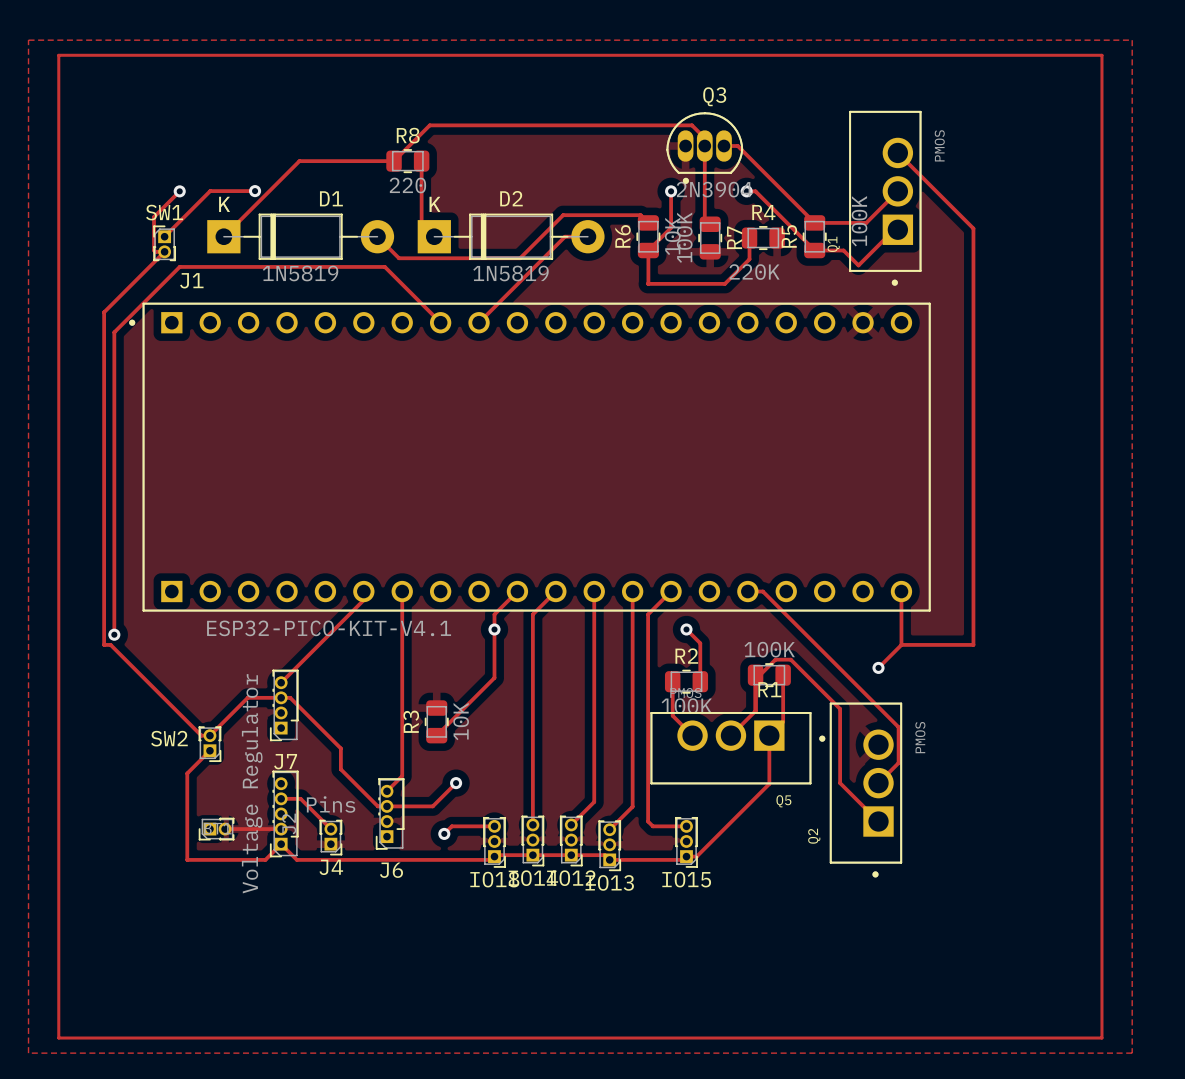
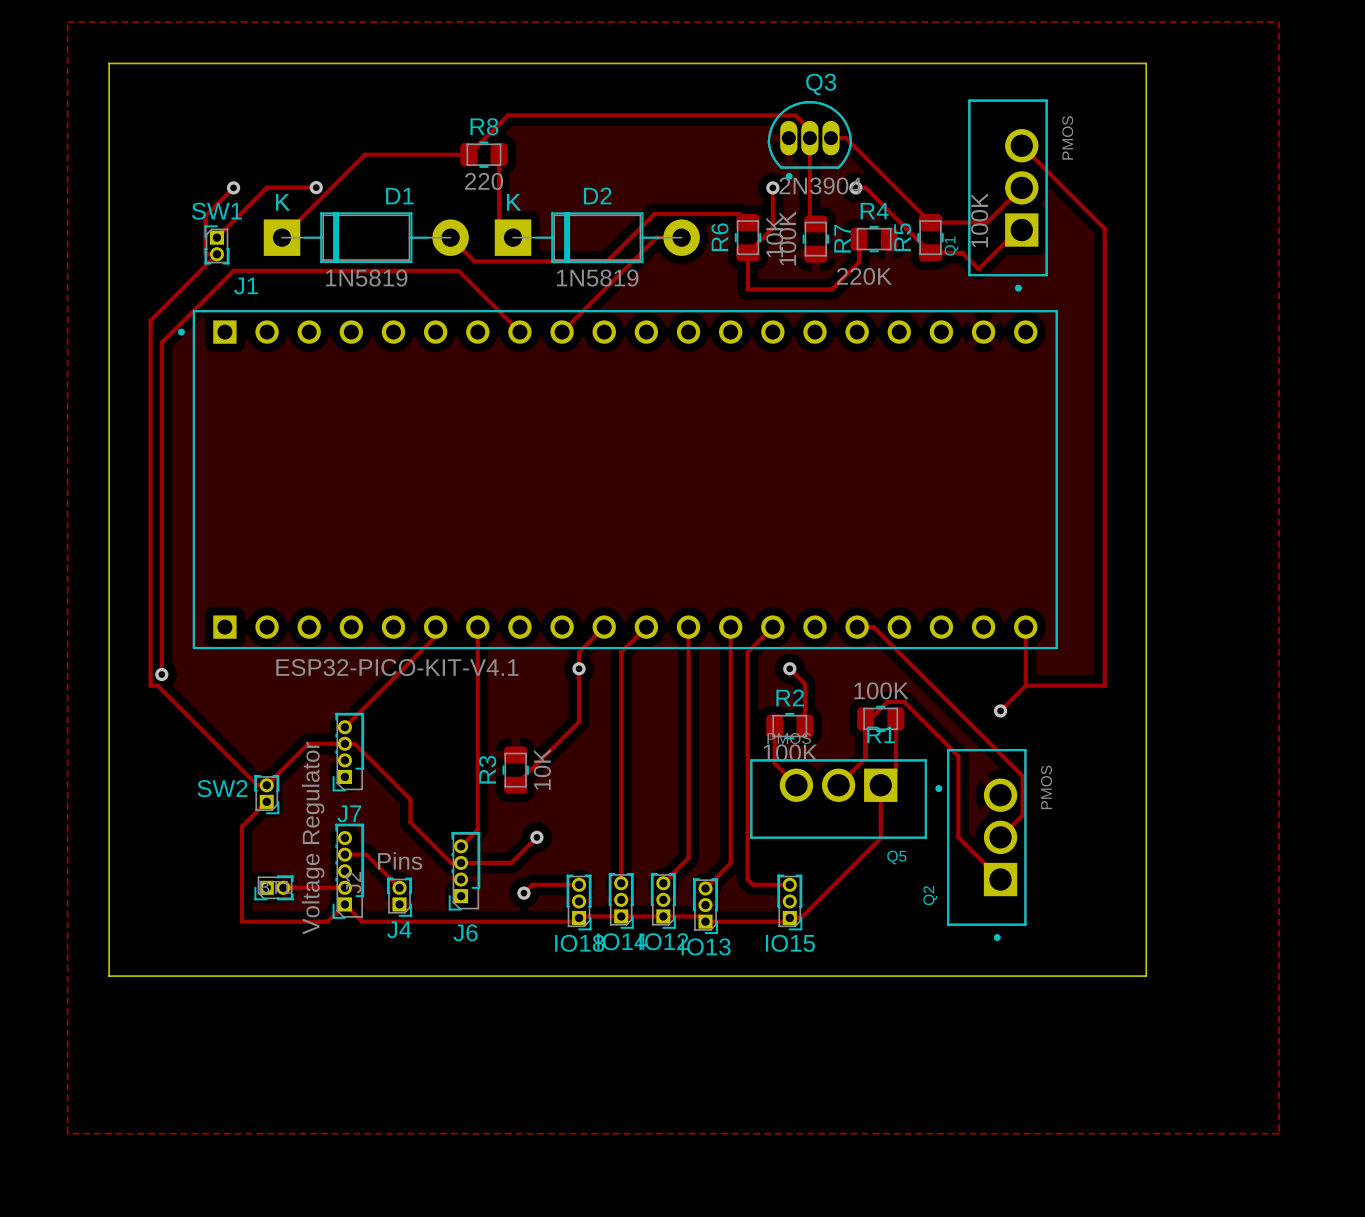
track: (58, 55) (1101, 55) (1101, 1038) (58, 1038) (58, 55) -> none
board edge: none -> (109, 63) (1146, 63) (1146, 976) (109, 976) (109, 63)

